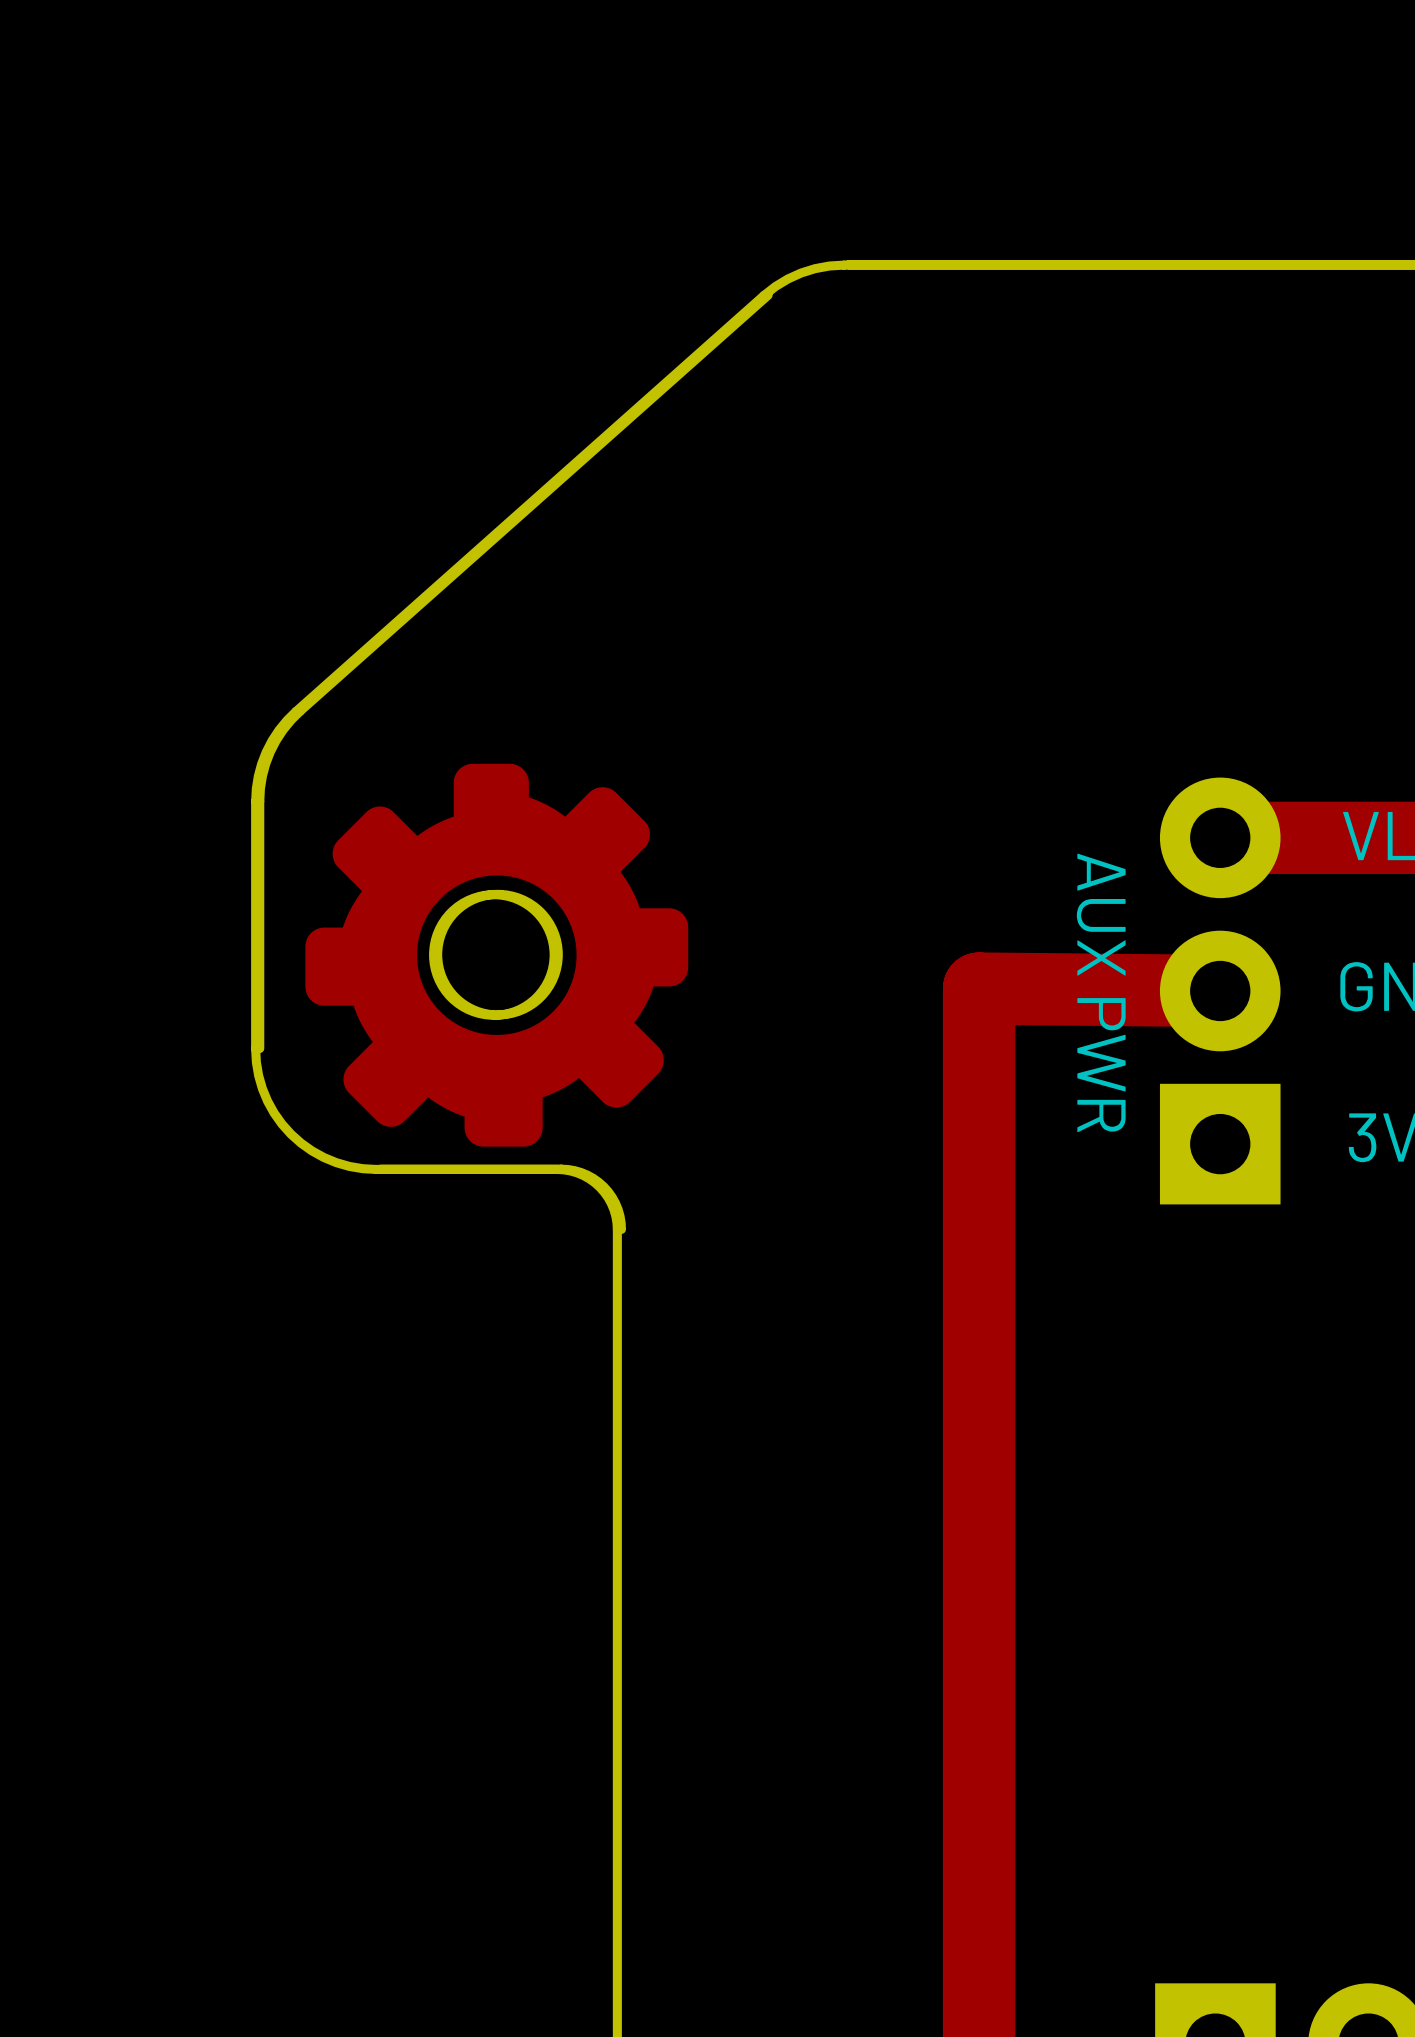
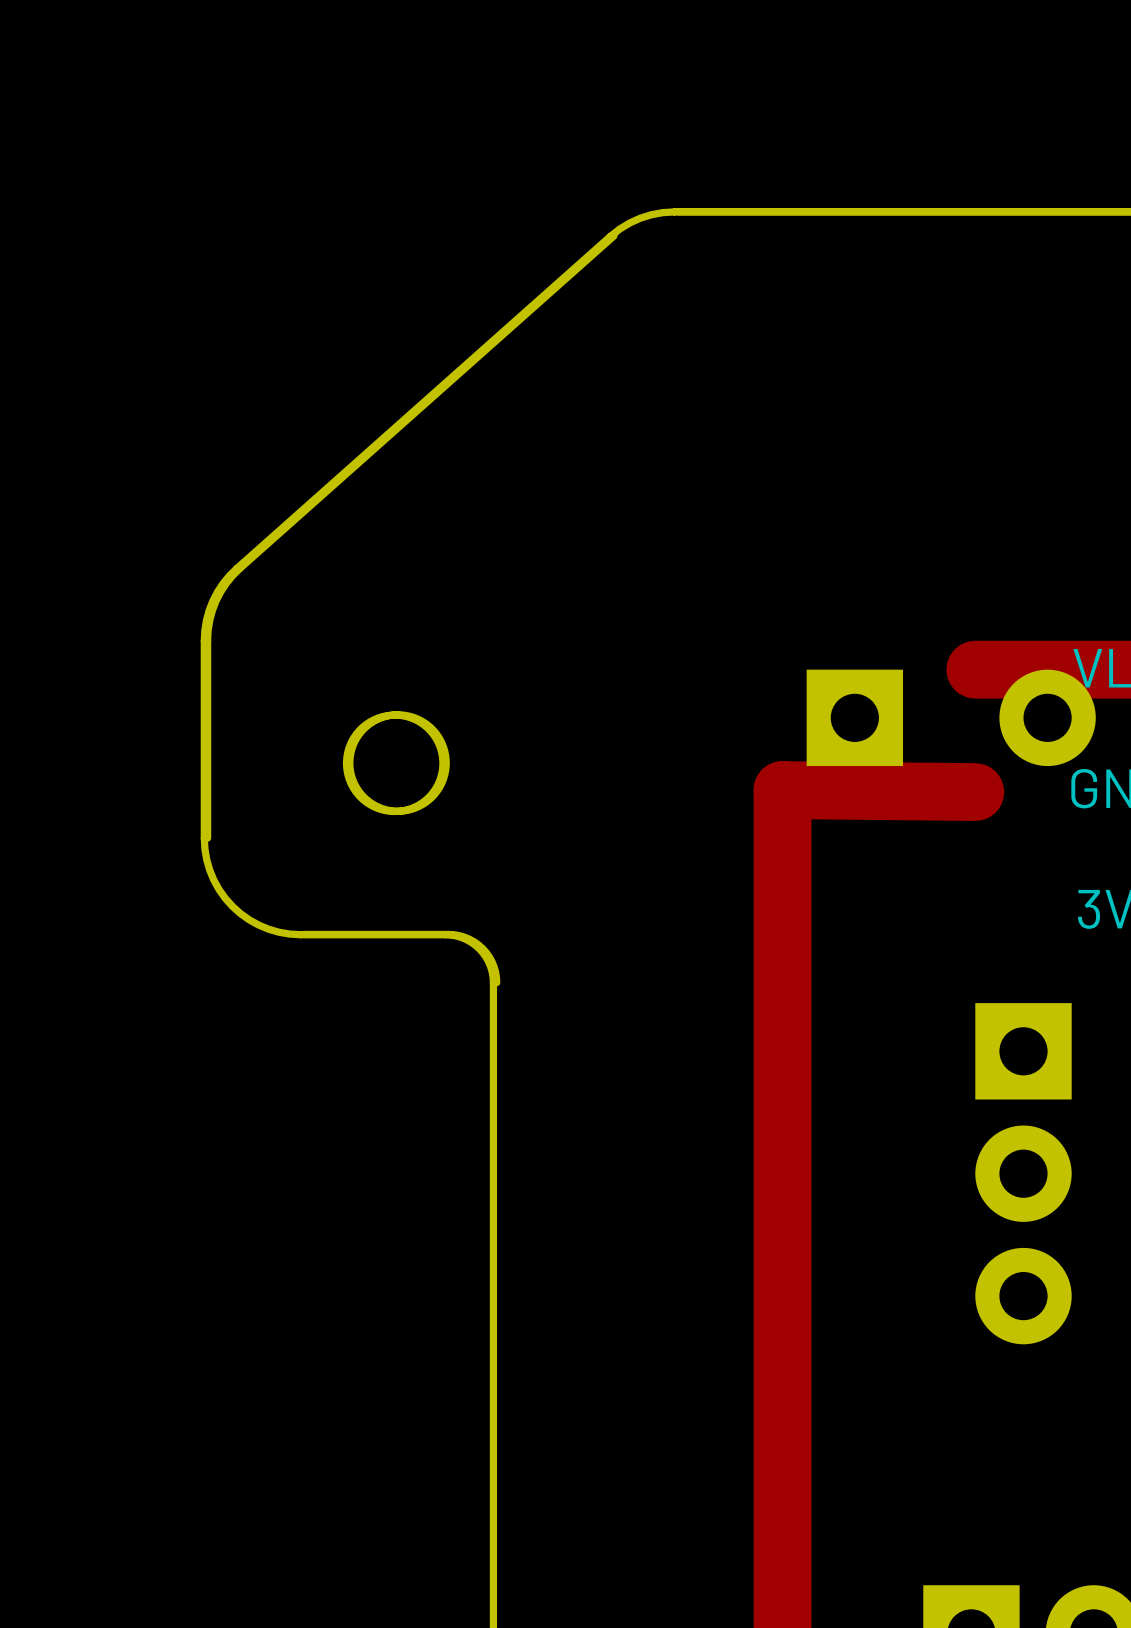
drawing: [305, 763, 689, 1147] -> none
part: none -> (951, 717)
part: (1220, 990) -> none
text: AUX PWR (1101, 992) -> none
part: none -> (1023, 1173)

